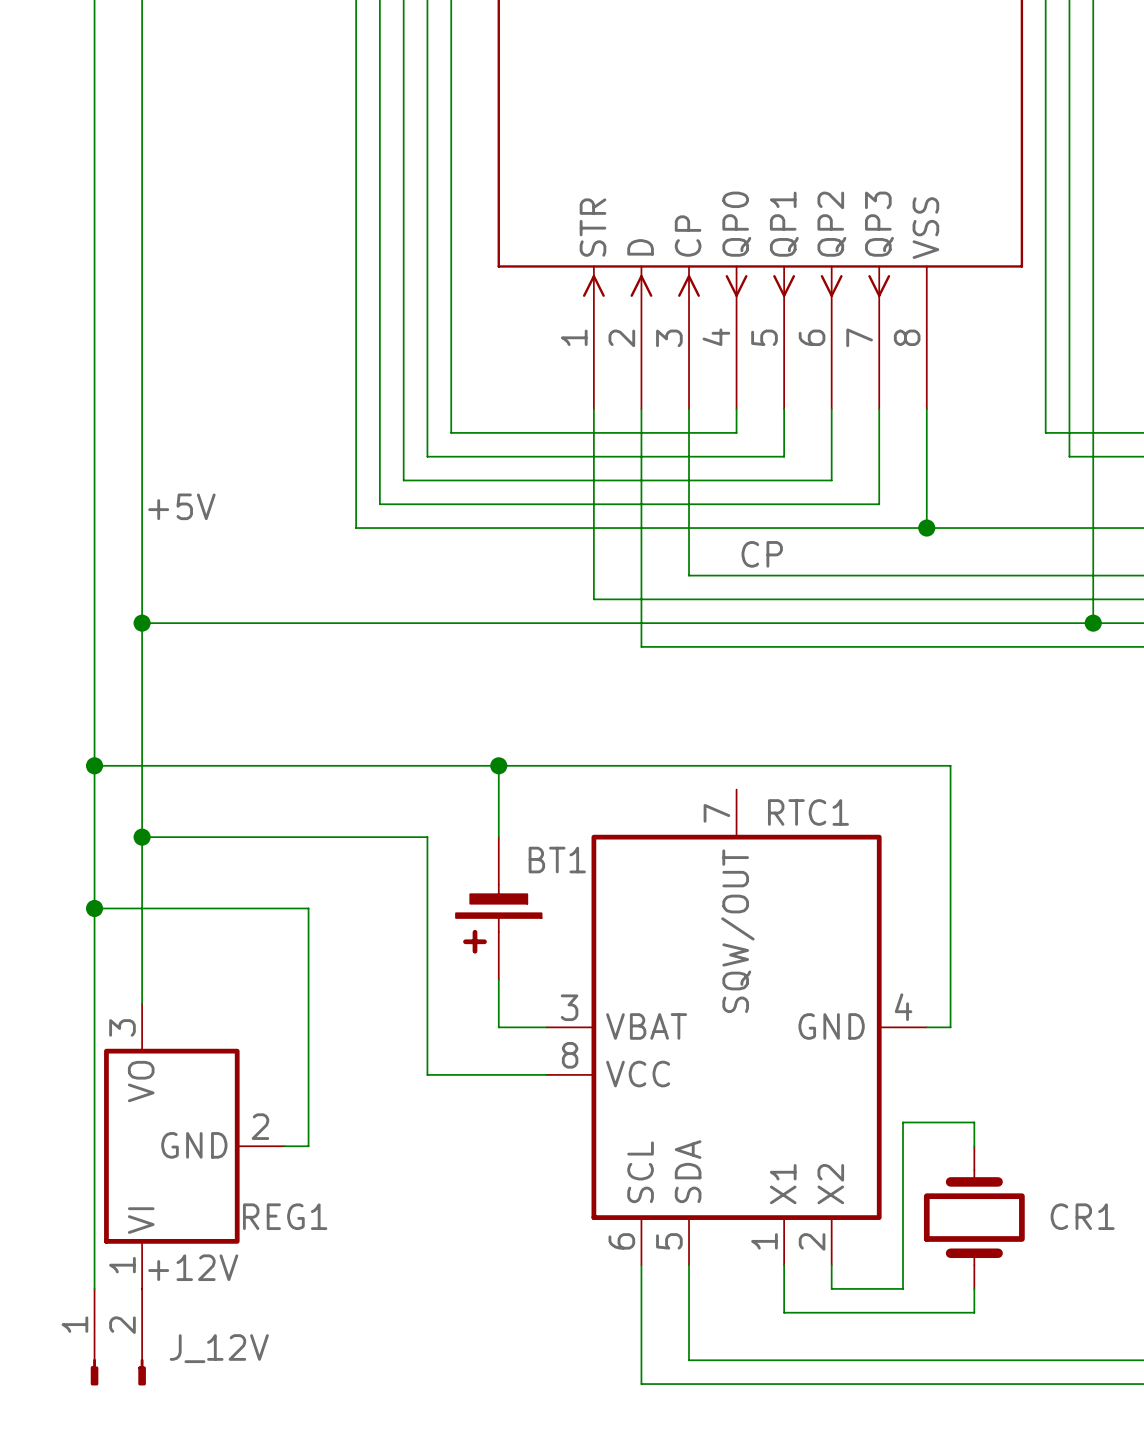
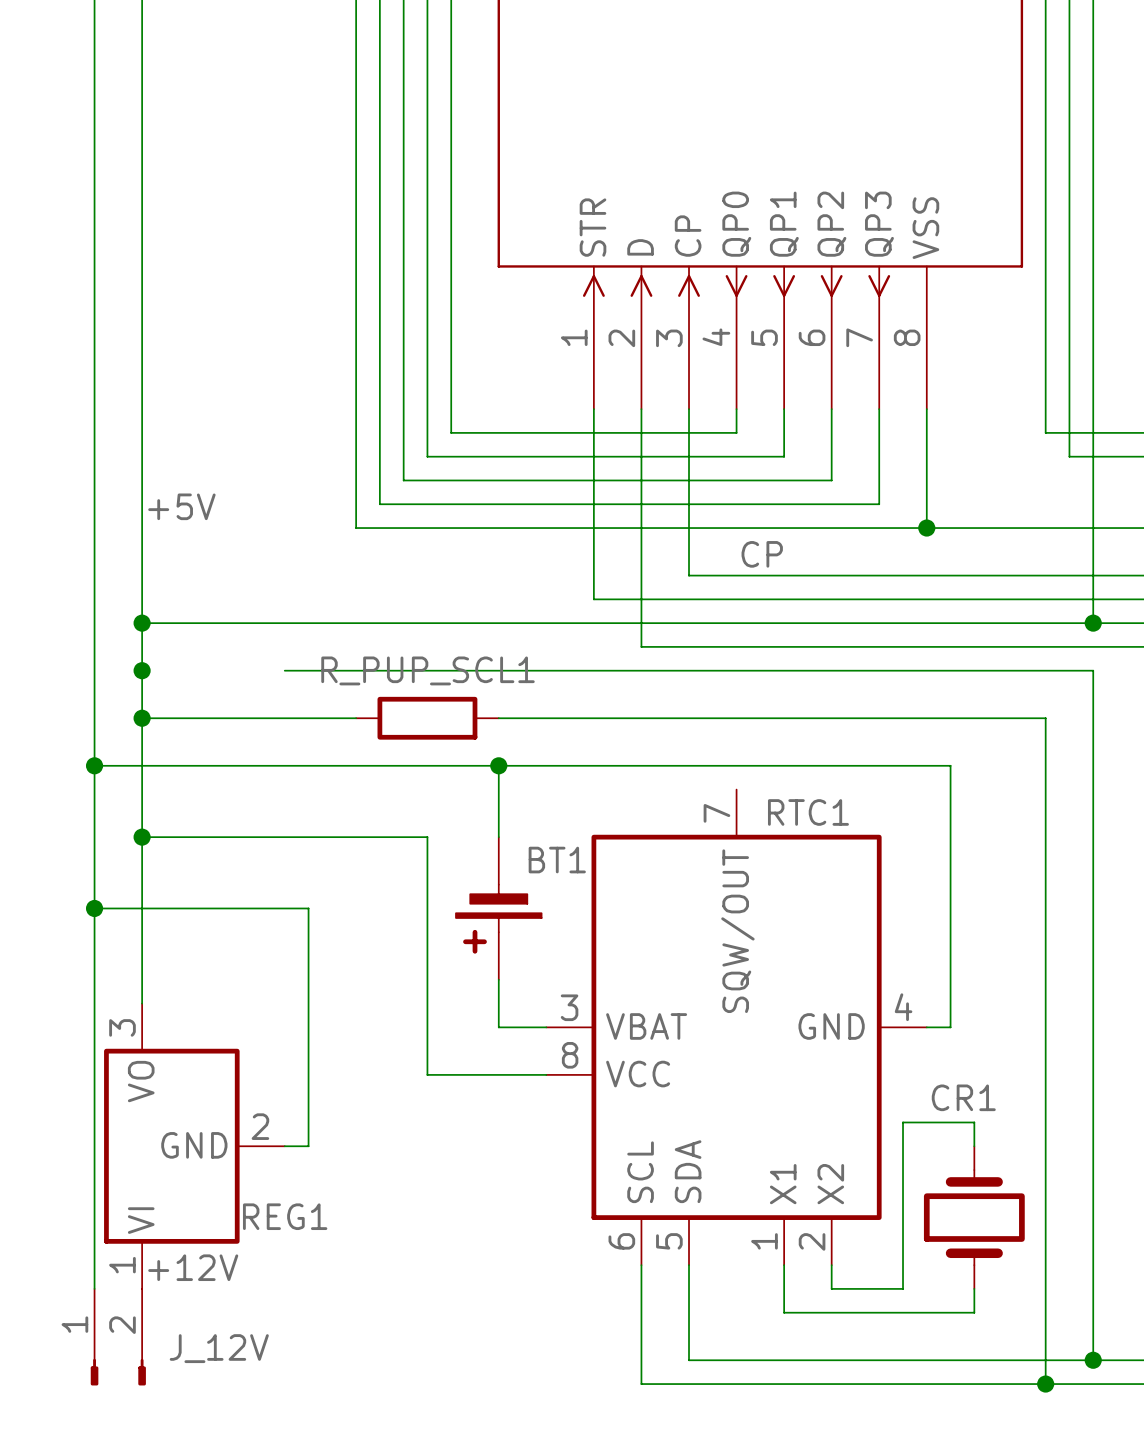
junction: none -> (142, 670)
wire: none -> (284, 670) (1093, 670) (1093, 1360)
wire: none -> (142, 718) (356, 718)
junction: none -> (142, 718)
R_PUP_SCL1: none -> (427, 718)
wire: none -> (498, 718) (1045, 718) (1045, 1384)
CR1 name position: CR1 (1082, 1216) -> CR1 (963, 1097)
junction: none -> (1093, 1360)
junction: none -> (1045, 1384)

